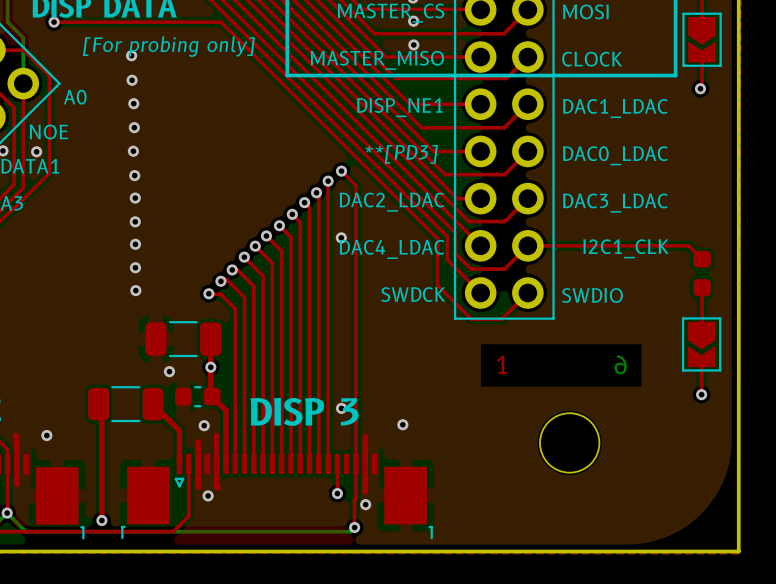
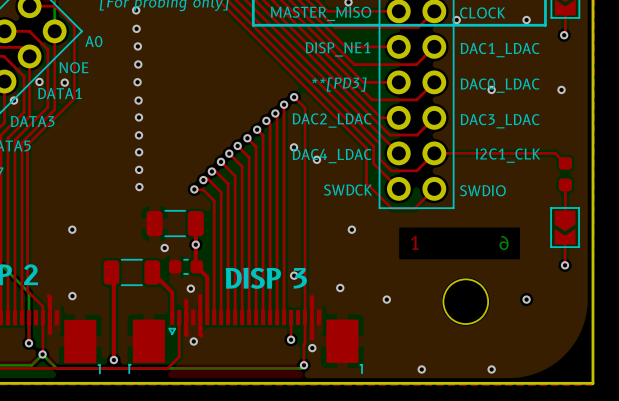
via: none -> (456, 20)
via: none -> (526, 20)
via: none -> (491, 89)
via: none -> (561, 89)
via: none -> (316, 159)
via: none -> (72, 229)
via: none -> (351, 229)
via: none -> (386, 299)
via: none -> (526, 299)
via: none -> (421, 369)
via: none -> (491, 369)

